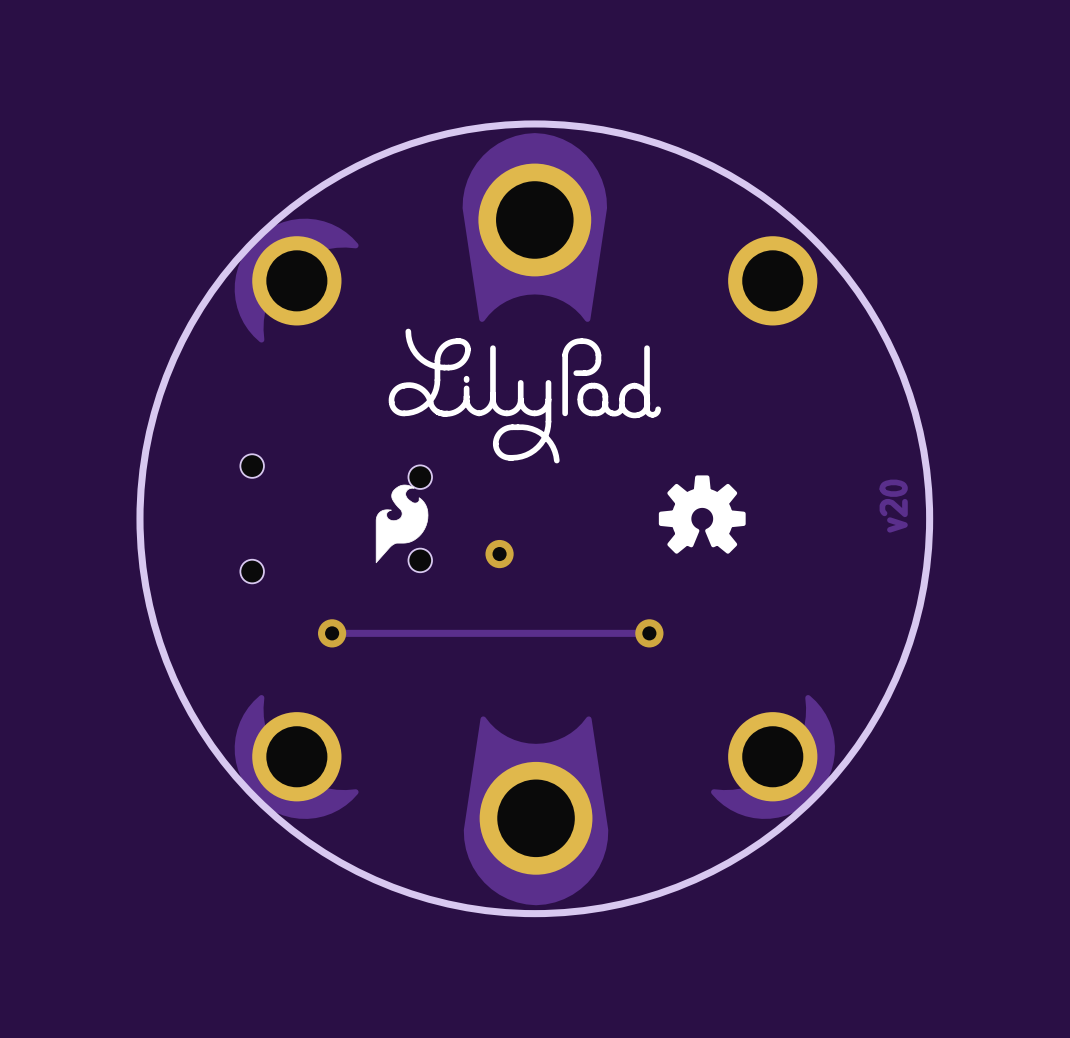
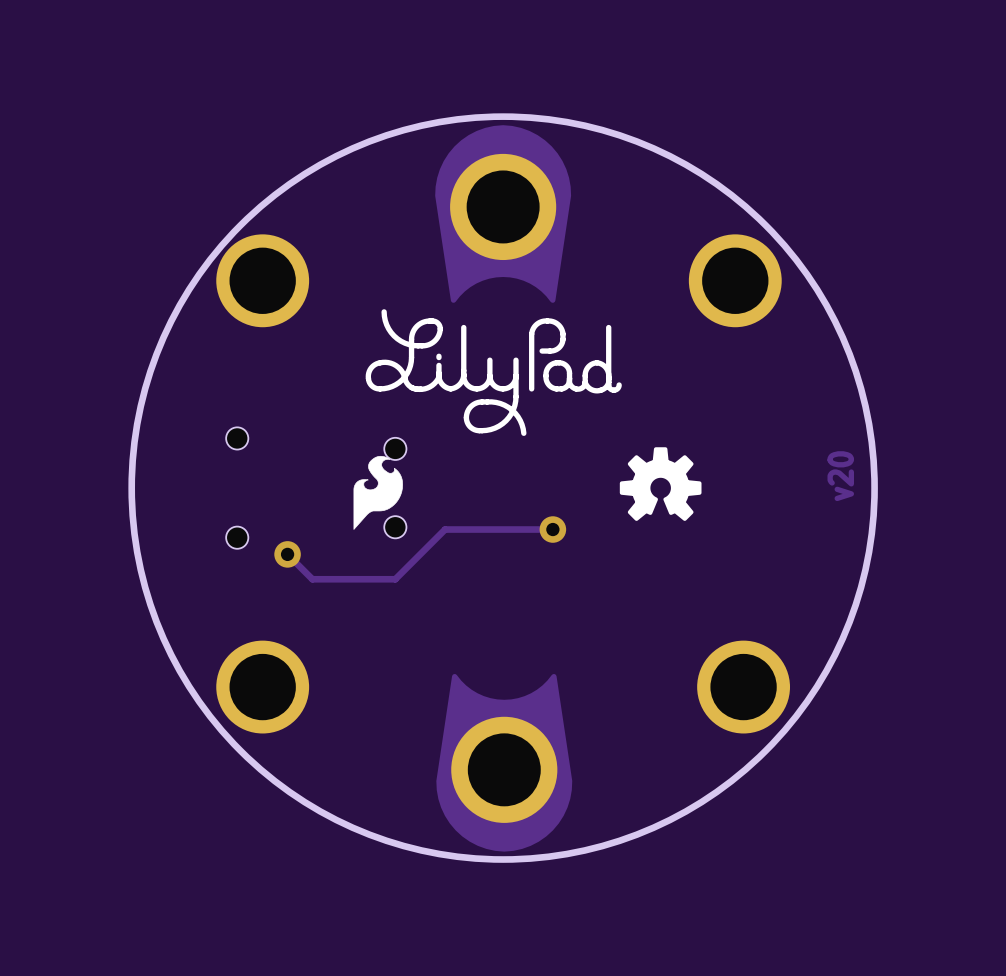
part footprint: [234, 218, 359, 343] -> [216, 234, 310, 328]
part footprint: [728, 236, 818, 326] -> [688, 234, 782, 328]
via: (499, 554) -> none
track: none -> (552, 529) (445, 529) (395, 579) (312, 579) (287, 554)
via: none -> (552, 529)
via position: (332, 633) -> (287, 554)
track: (649, 633) (332, 633) -> none
via: (649, 633) -> none
part: none -> (262, 687)
part: none -> (743, 687)
part: (296, 756) -> none
part: (772, 756) -> none

